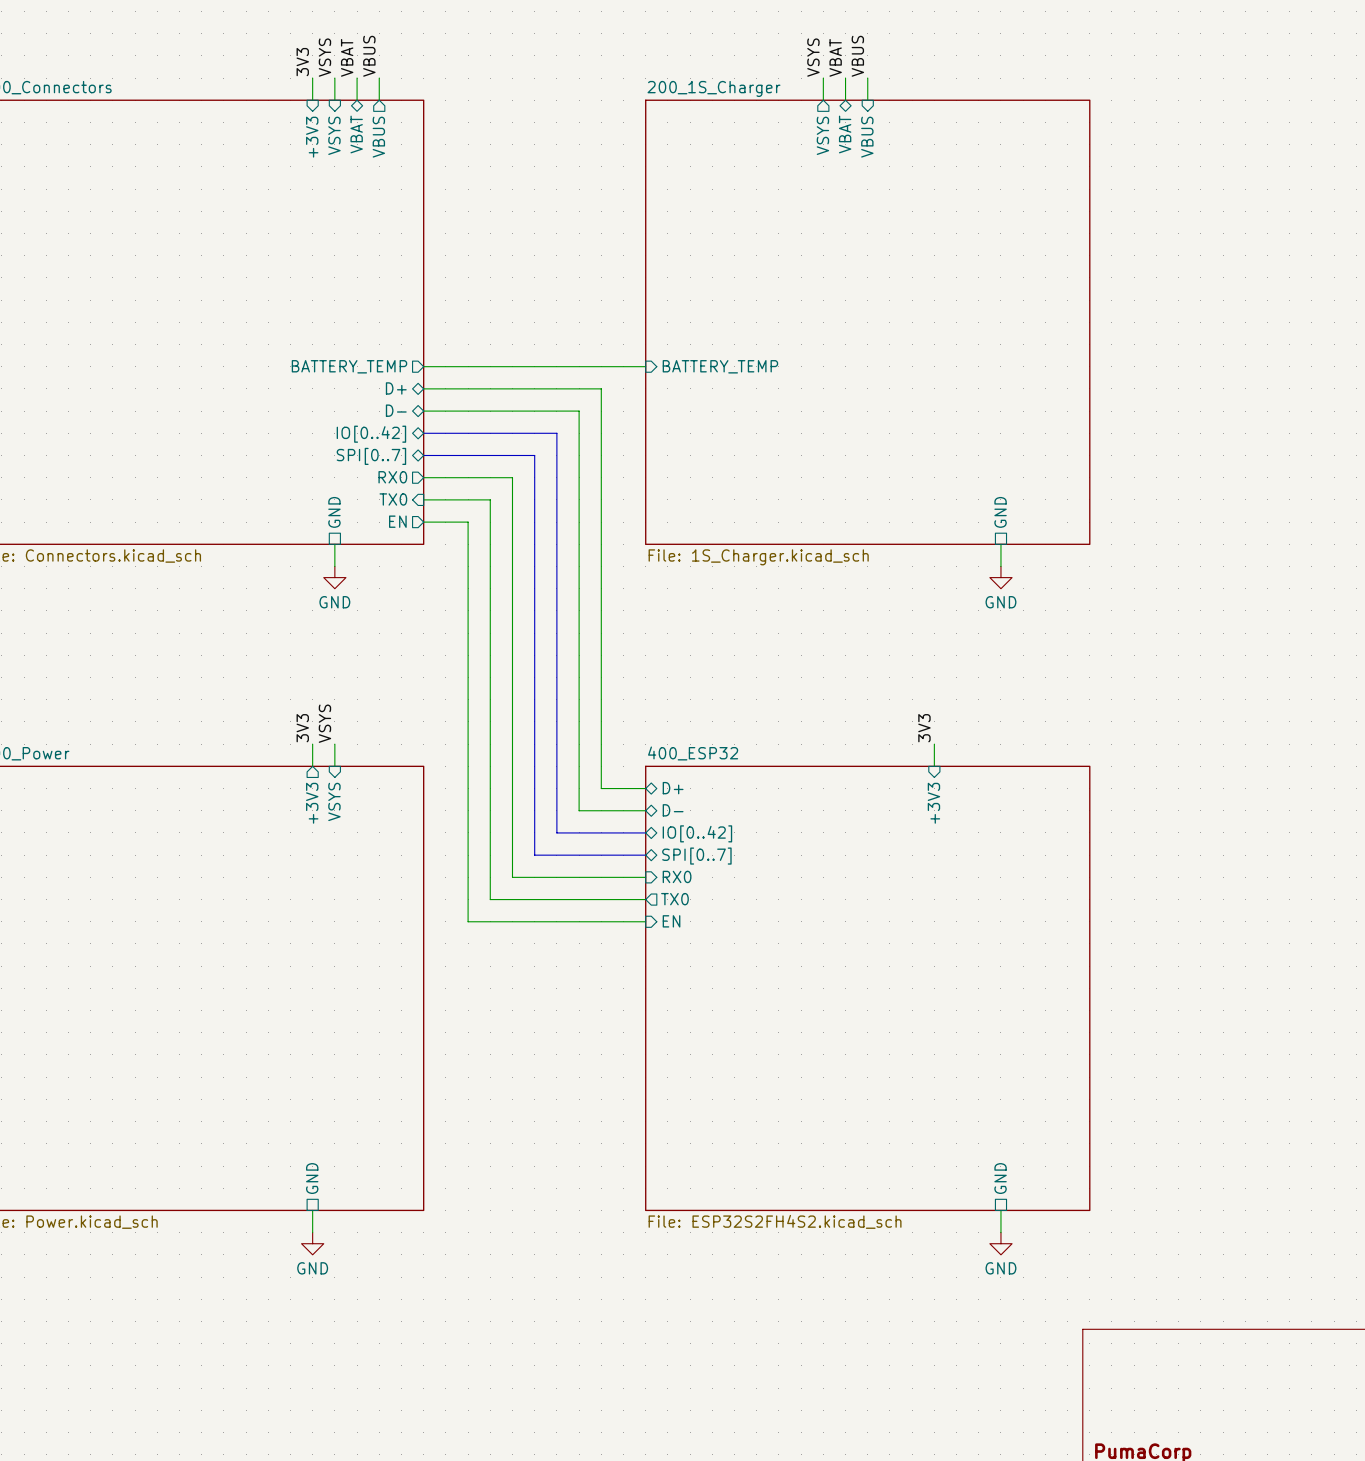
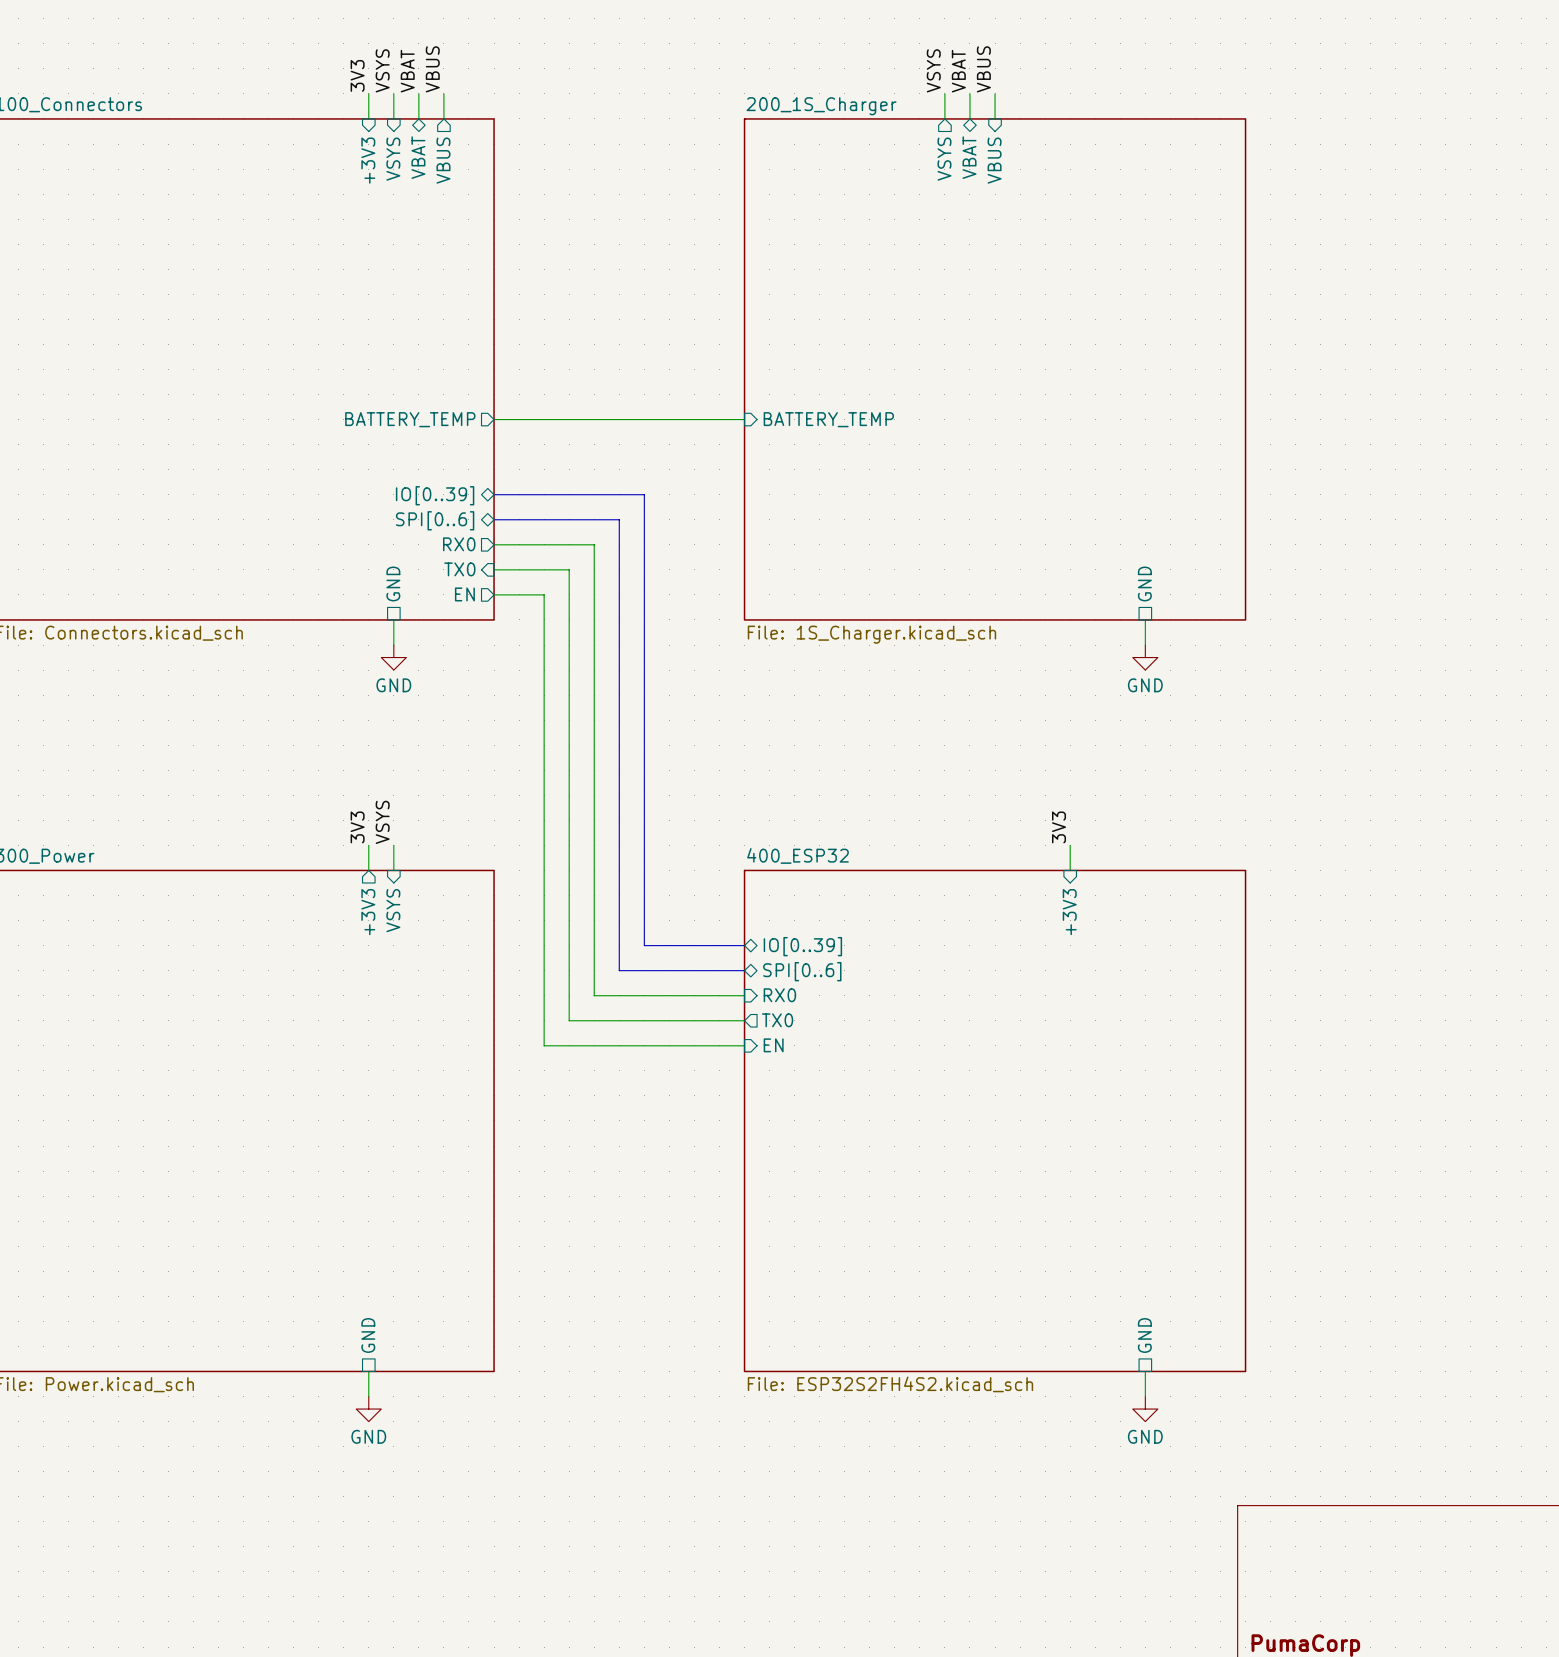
sheet pin: D+ (396, 388) -> none
wire: (423, 388) (601, 388) (601, 788) (645, 788) -> none
sheet pin: D- (396, 410) -> none
wire: (423, 411) (579, 411) (579, 810) (645, 810) -> none
sheet pin: IO[0..42] (371, 434) -> IO[0..39] (435, 495)
sheet pin: SPI[0..7] (371, 456) -> SPI[0..6] (435, 520)
sheet pin: D+ (673, 788) -> none
sheet pin: D- (673, 810) -> none
sheet pin: IO[0..42] (697, 833) -> IO[0..39] (802, 946)
sheet pin: SPI[0..7] (696, 856) -> SPI[0..6] (802, 971)

